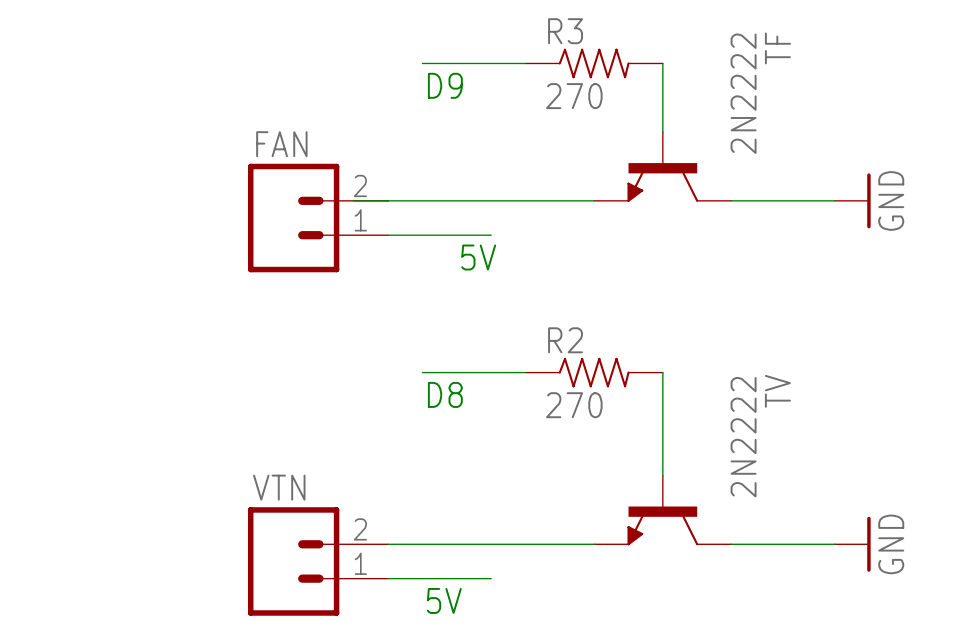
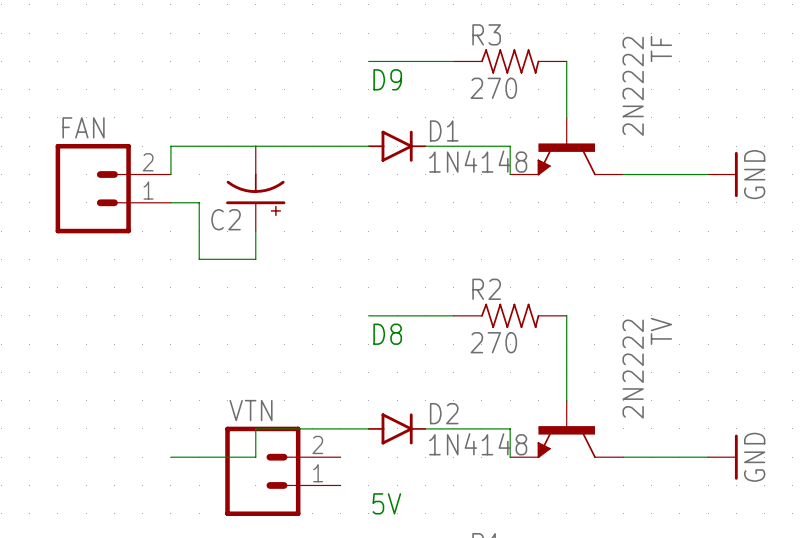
wire: none -> (368, 146) (170, 146) (170, 174)
D1: none -> 1N4148 (397, 146)
wire: (353, 200) (594, 200) -> (425, 146) (510, 146) (510, 174)
C2: none -> (255, 188)
FAN position: (318, 218) -> (113, 188)
wire: none -> (170, 202) (199, 202) (199, 259) (255, 259) (255, 231)
wire: (388, 235) (491, 235) -> none
text: 5V (478, 257) -> none
wire: none -> (368, 428) (255, 428) (255, 457) (170, 457)
D2: none -> 1N4148 (397, 428)
wire: (388, 544) (594, 544) -> (425, 428) (510, 428) (510, 457)
wire: (388, 578) (491, 578) -> none

